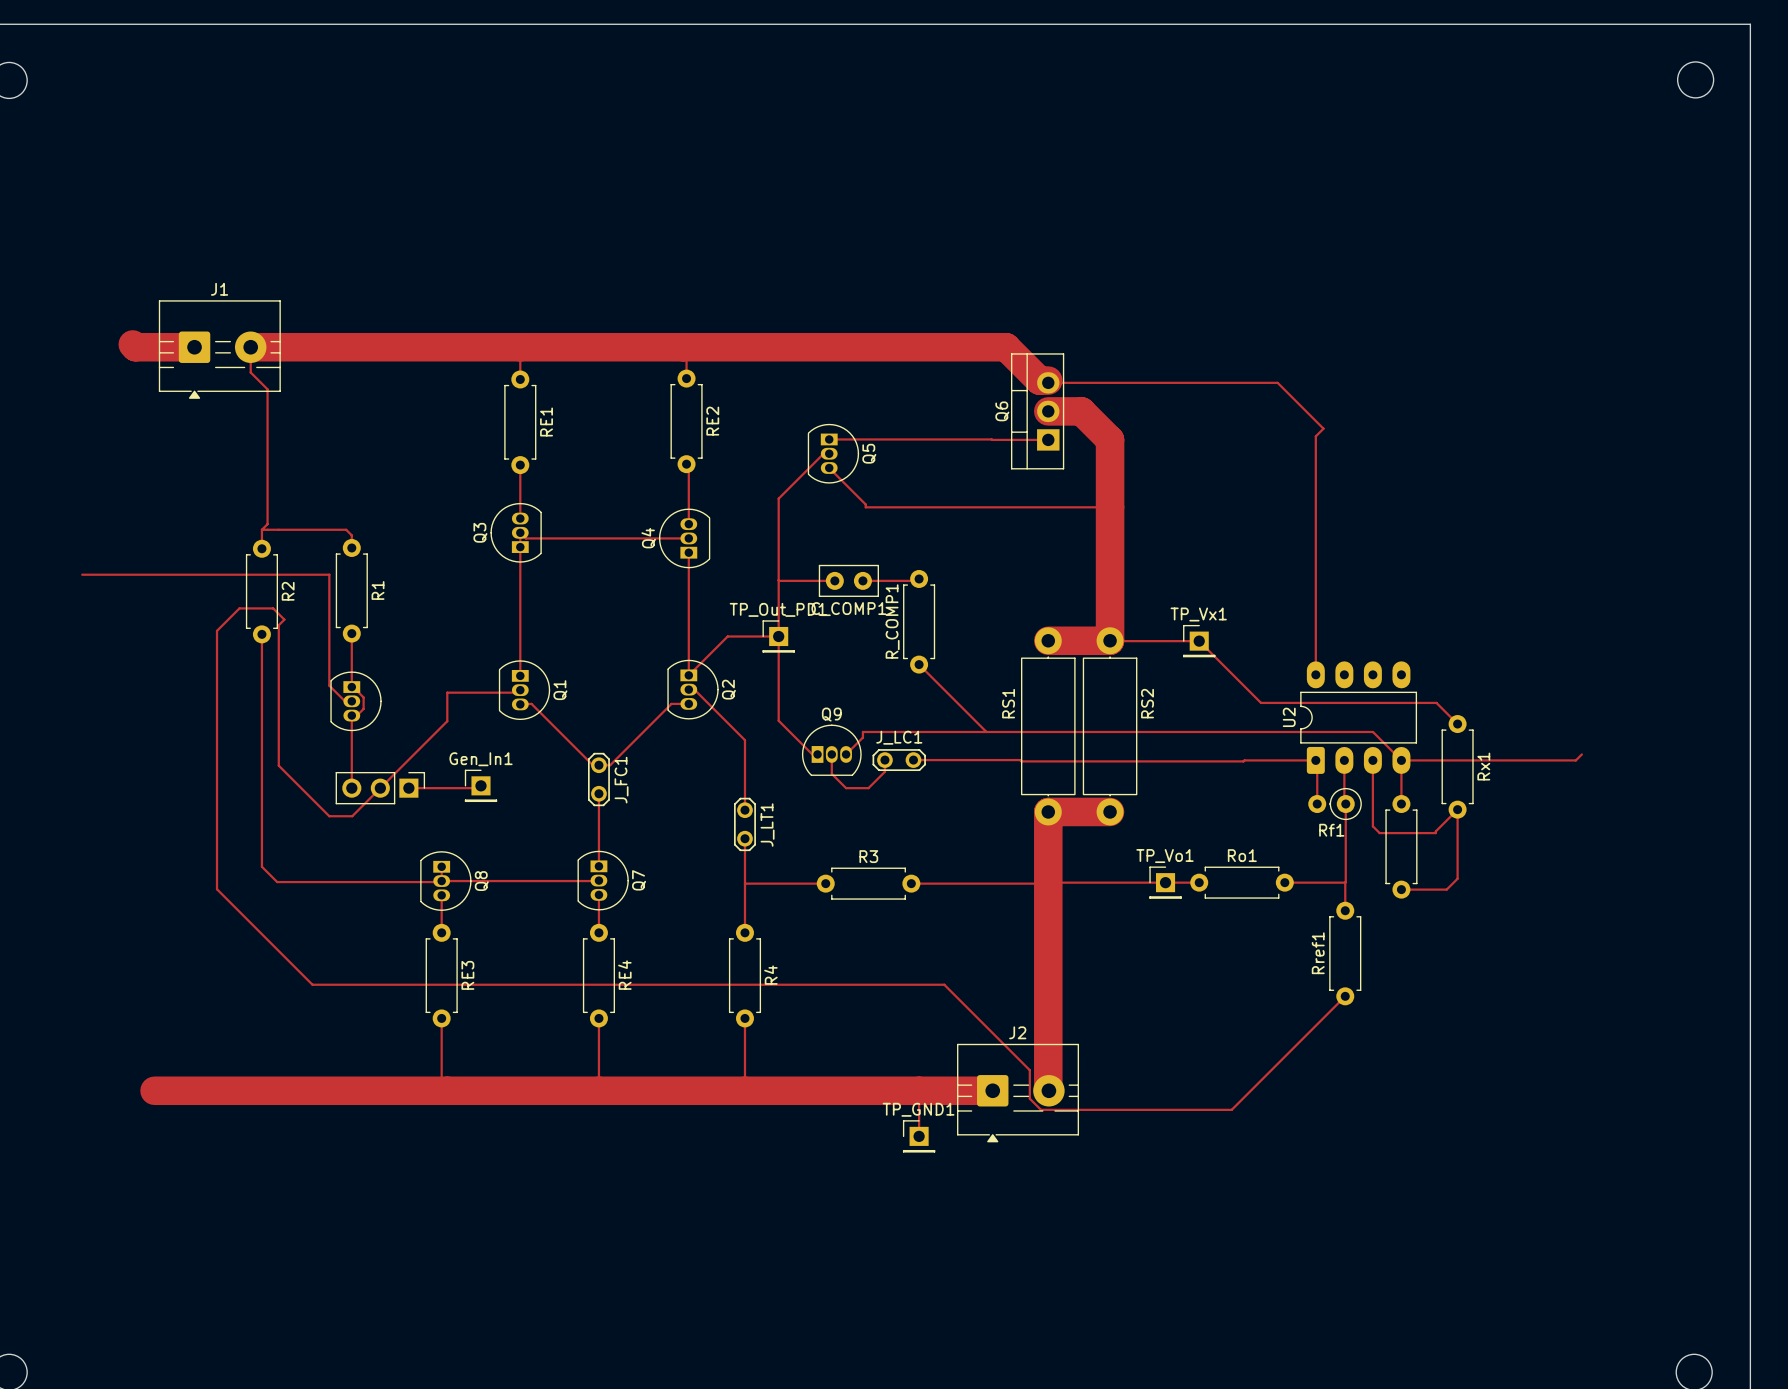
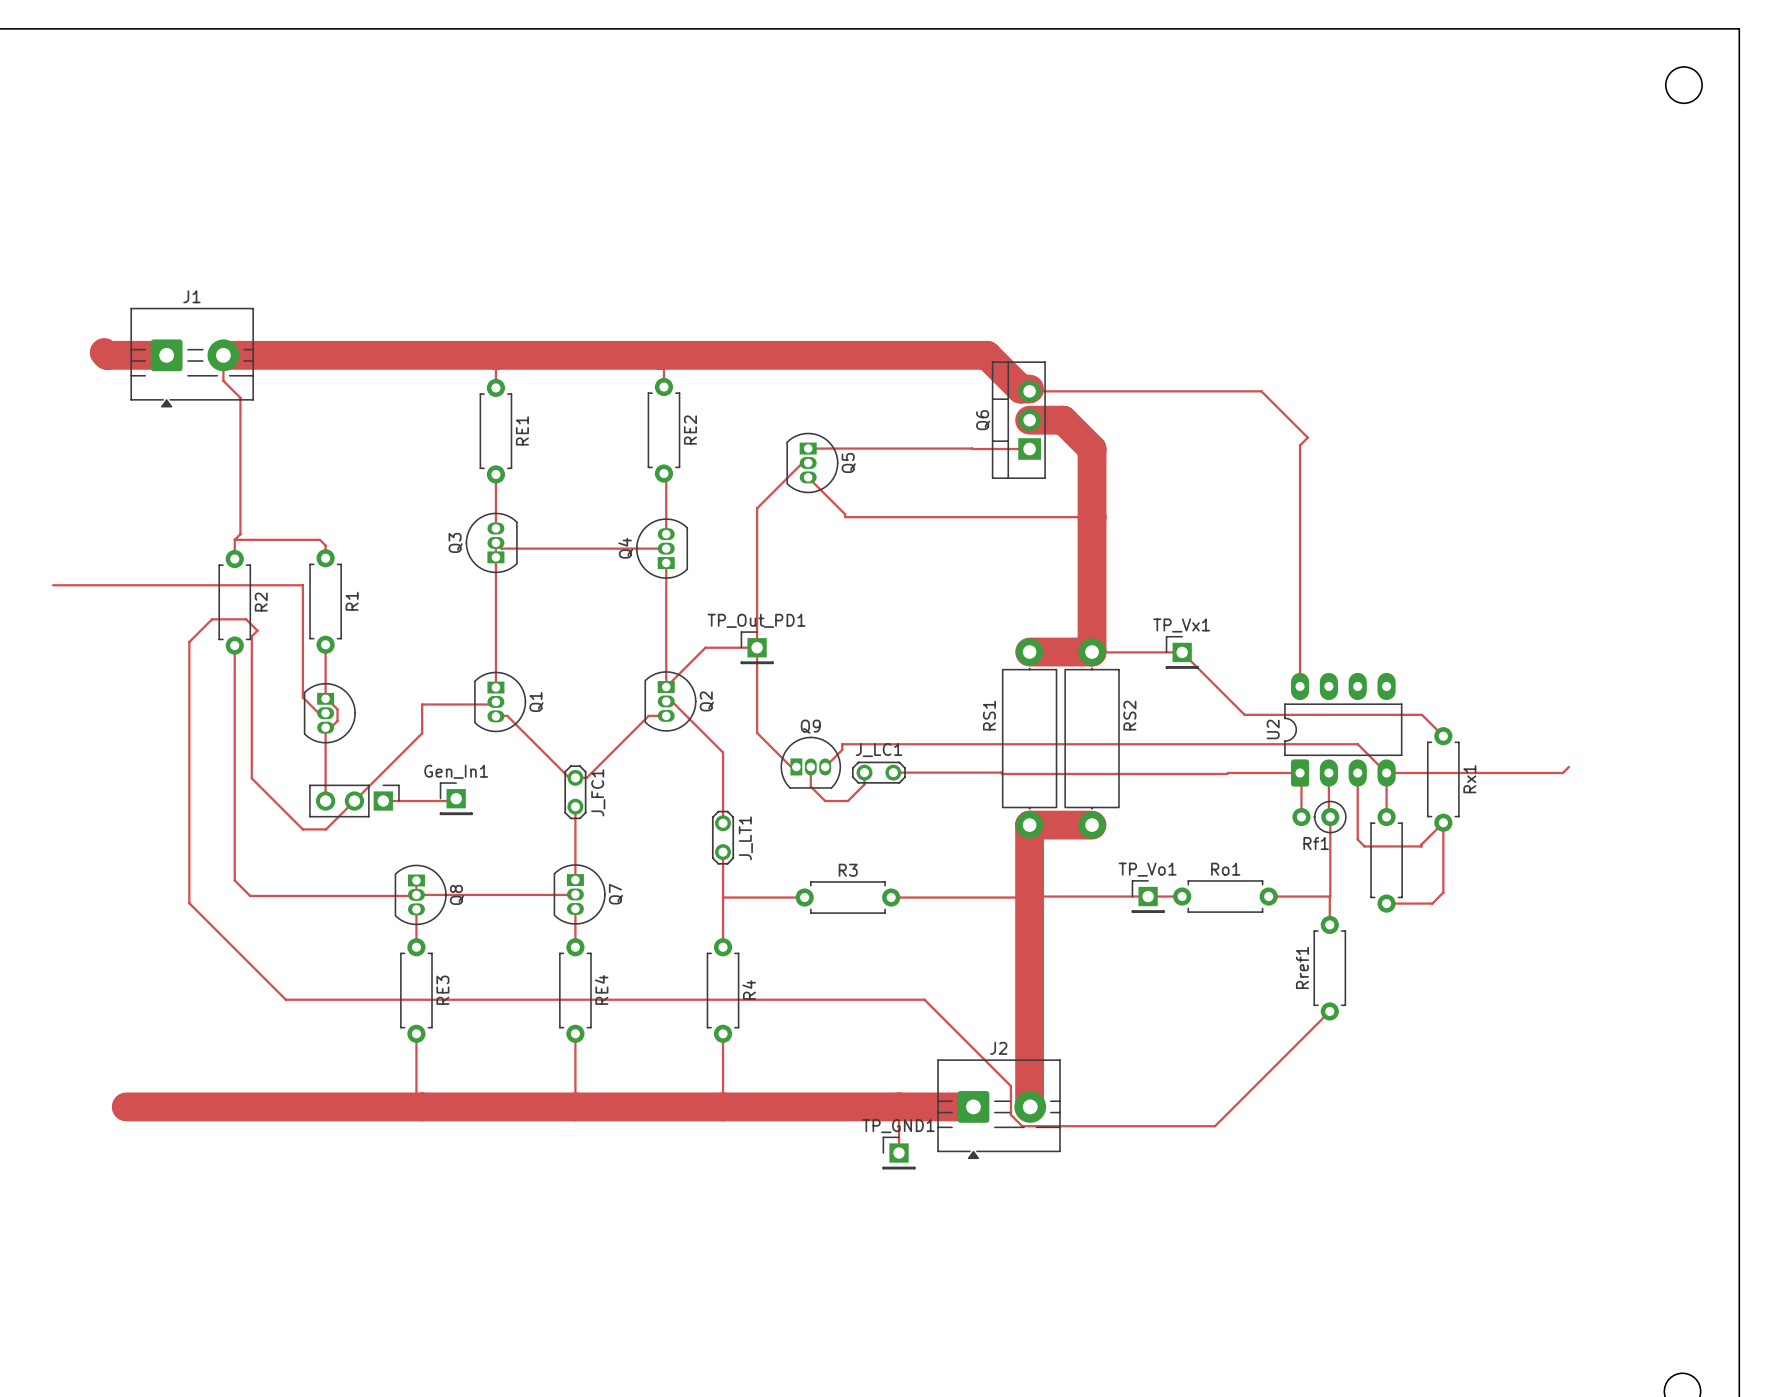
top track: (919, 578) (917, 580) (862, 580) -> none
top track: (778, 580) (834, 580) -> none
C_COMP1: (848, 580) -> none
R_COMP1: (919, 621) -> none
top track: (919, 664) (986, 731) -> none

